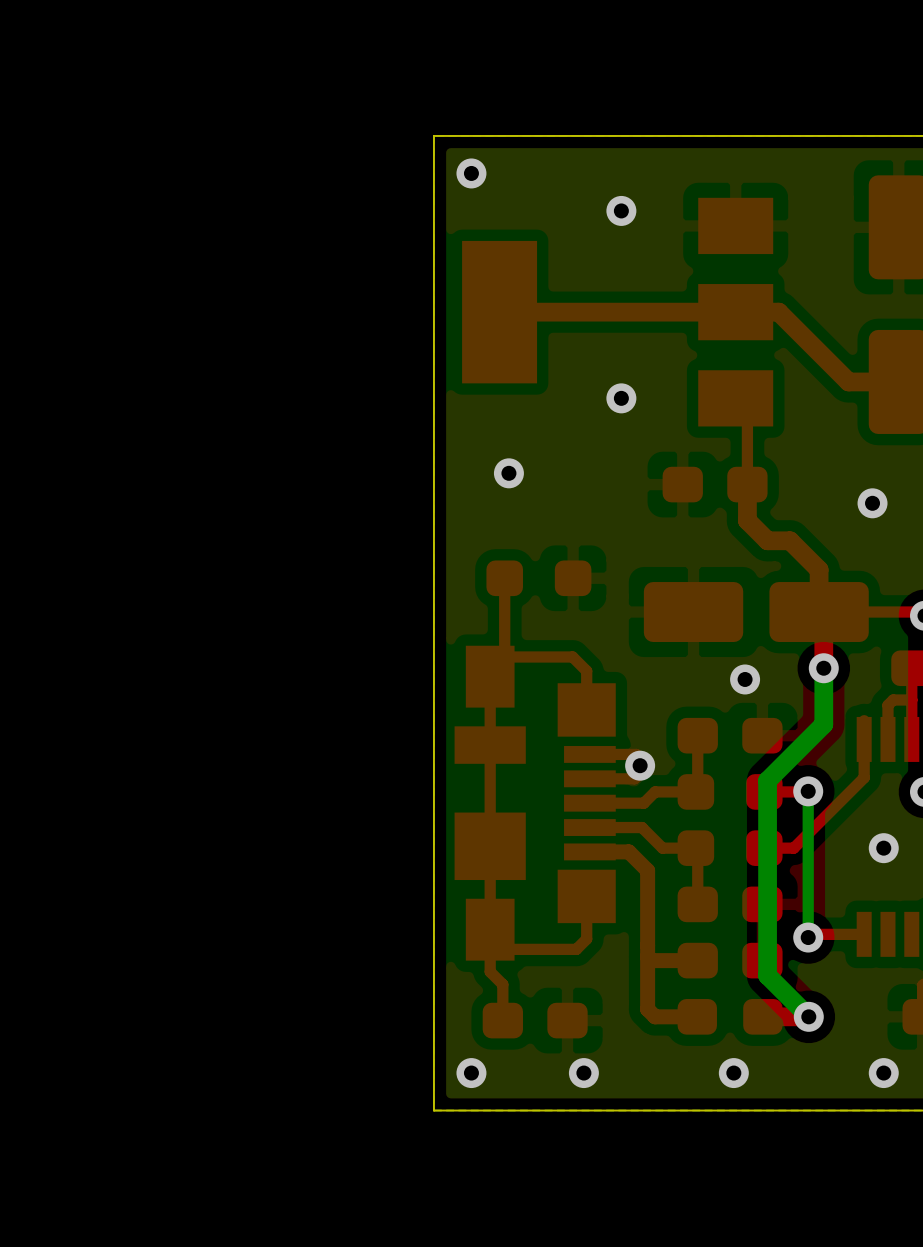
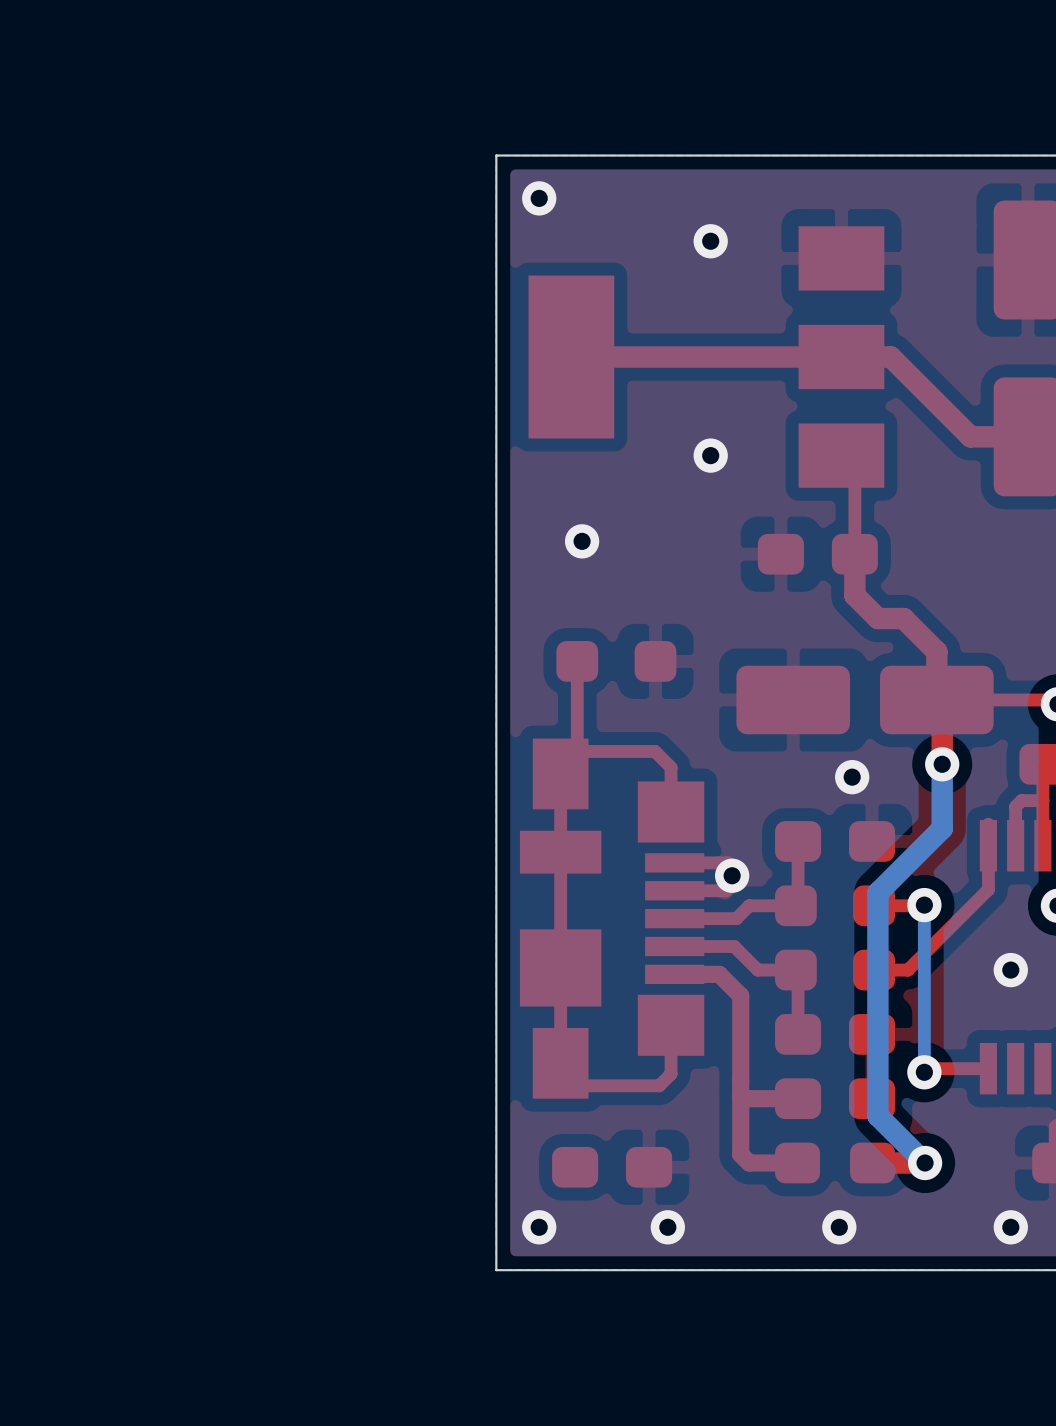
via: (872, 503) -> none
top track: (490, 929) (490, 971) (502, 984) (502, 1020) -> none

